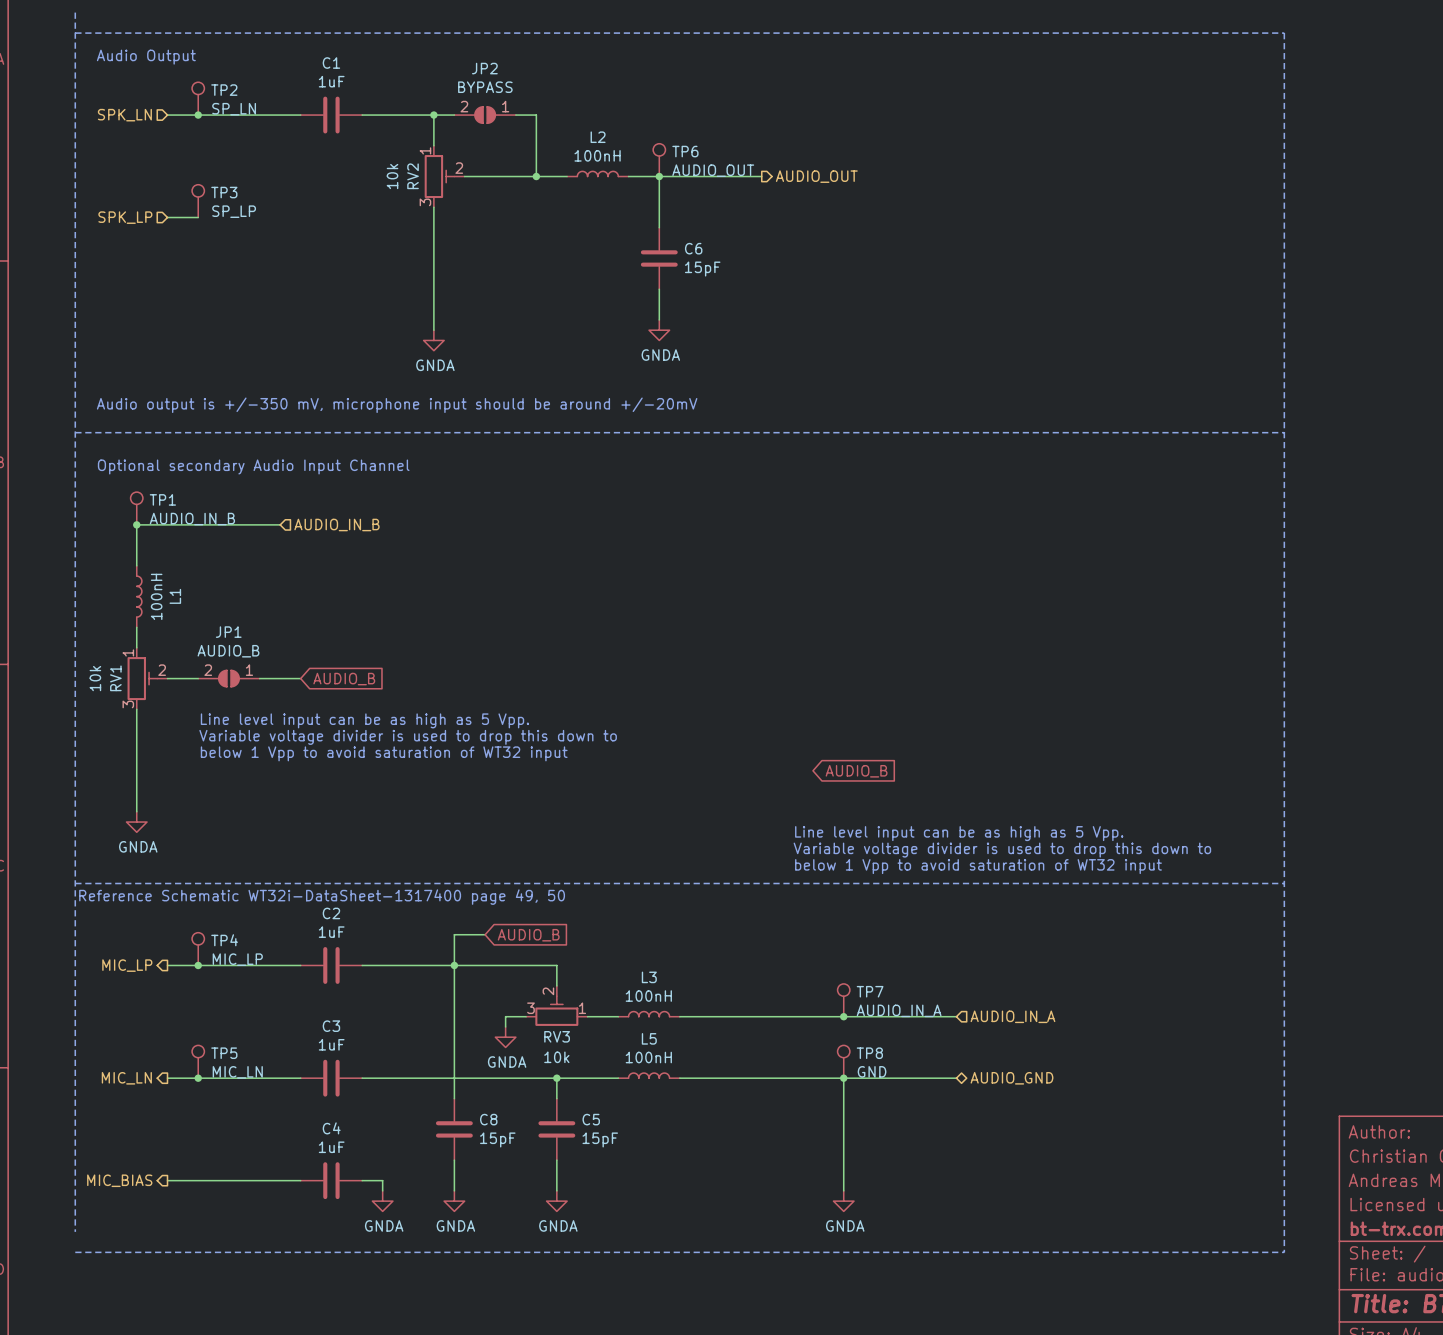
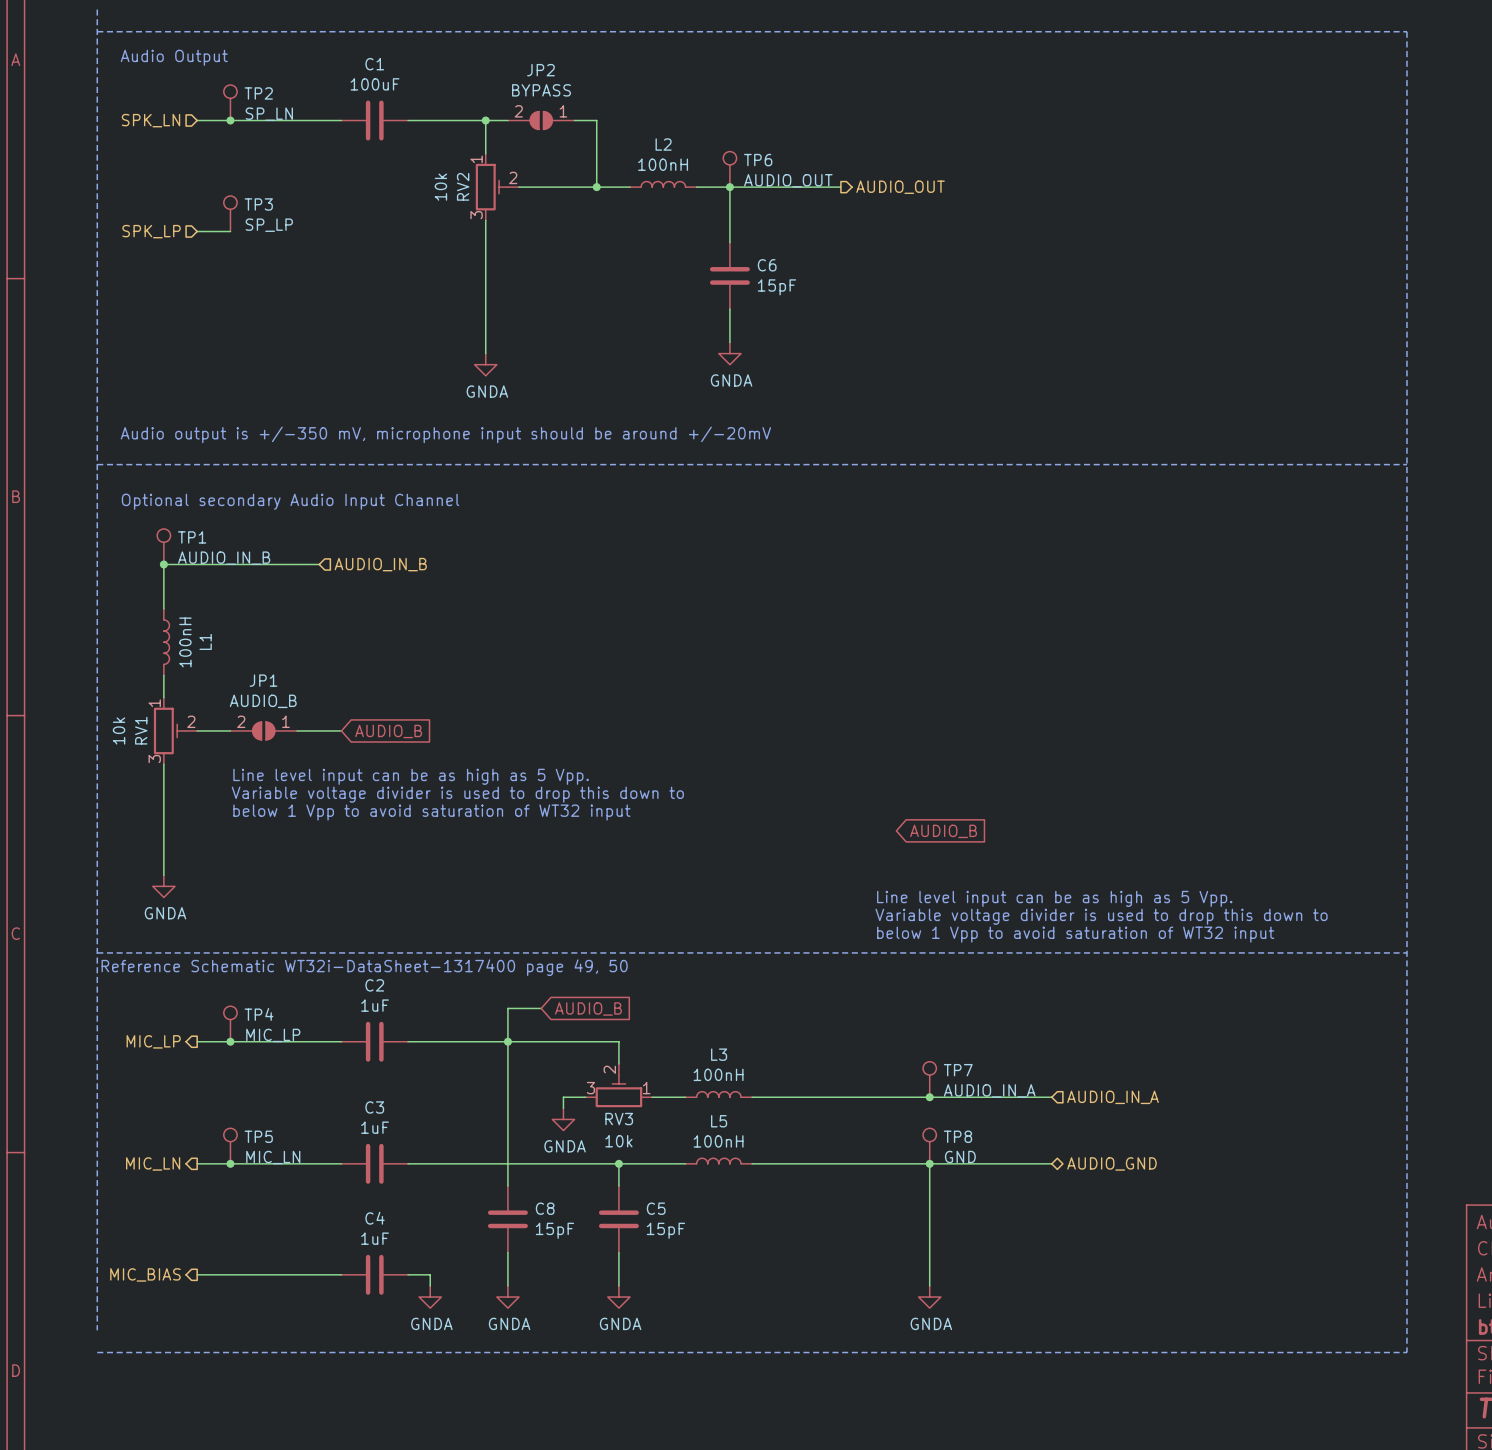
C1 value: 1uF (331, 81) -> 100uF (375, 84)

